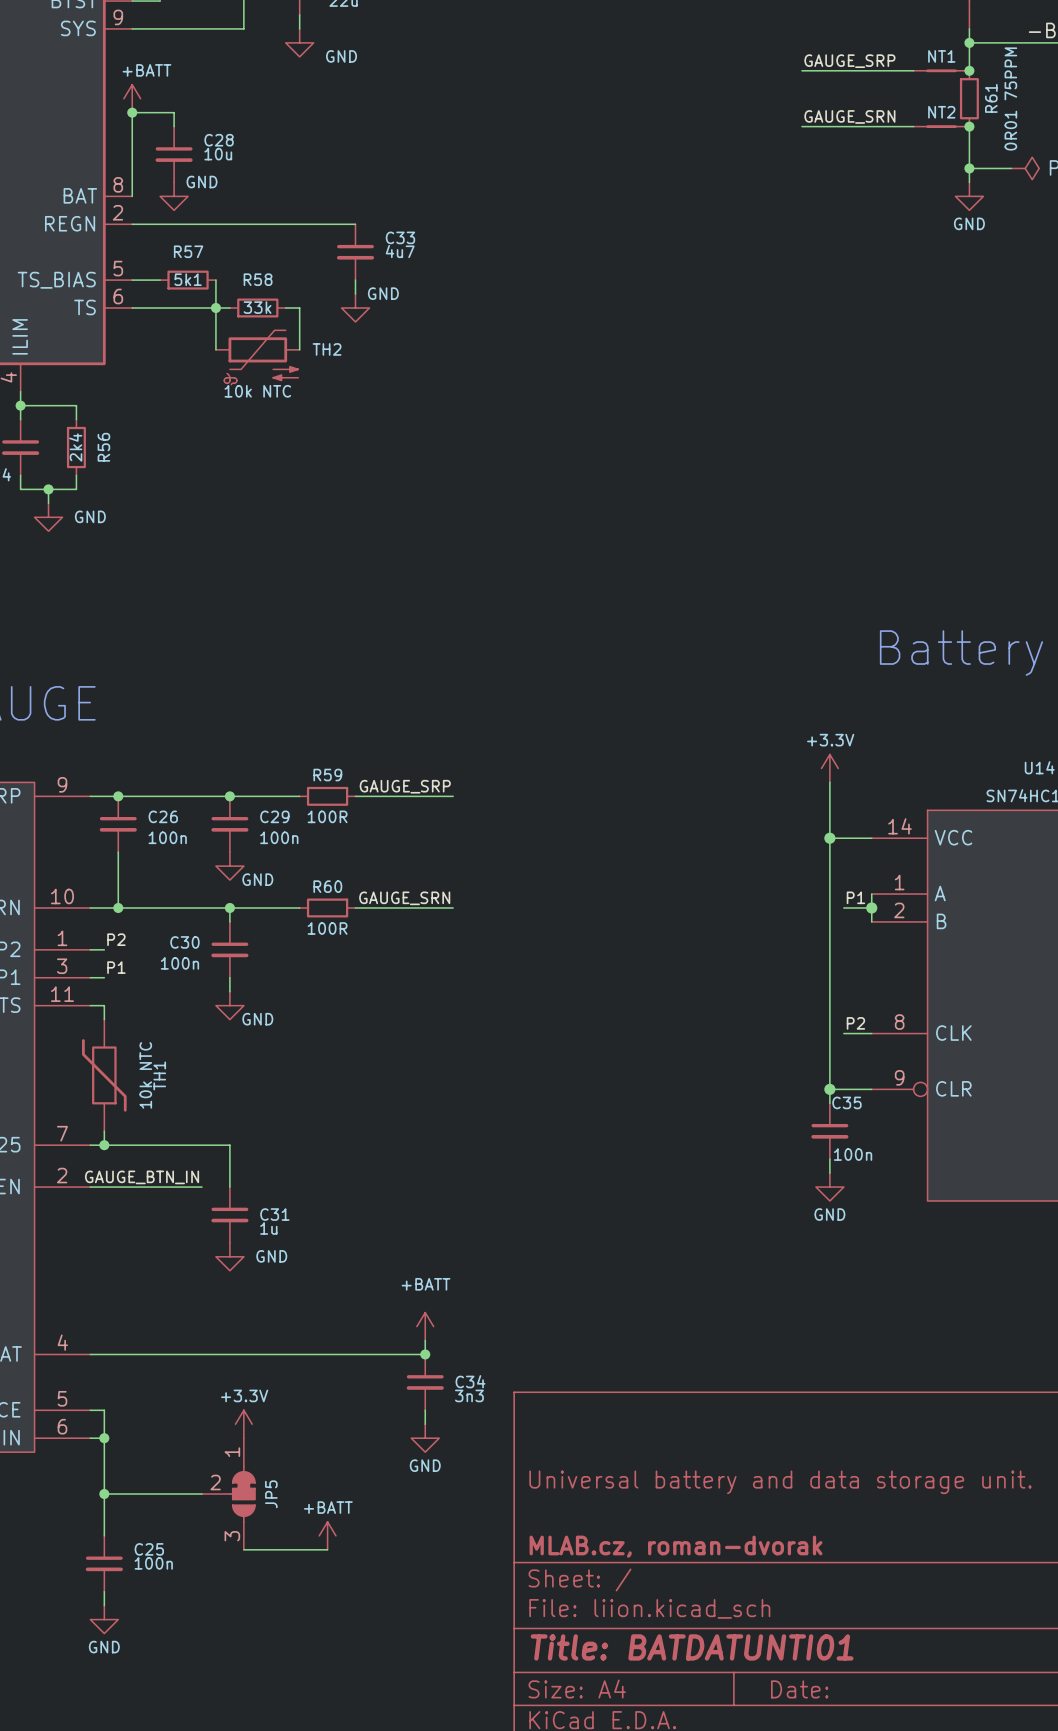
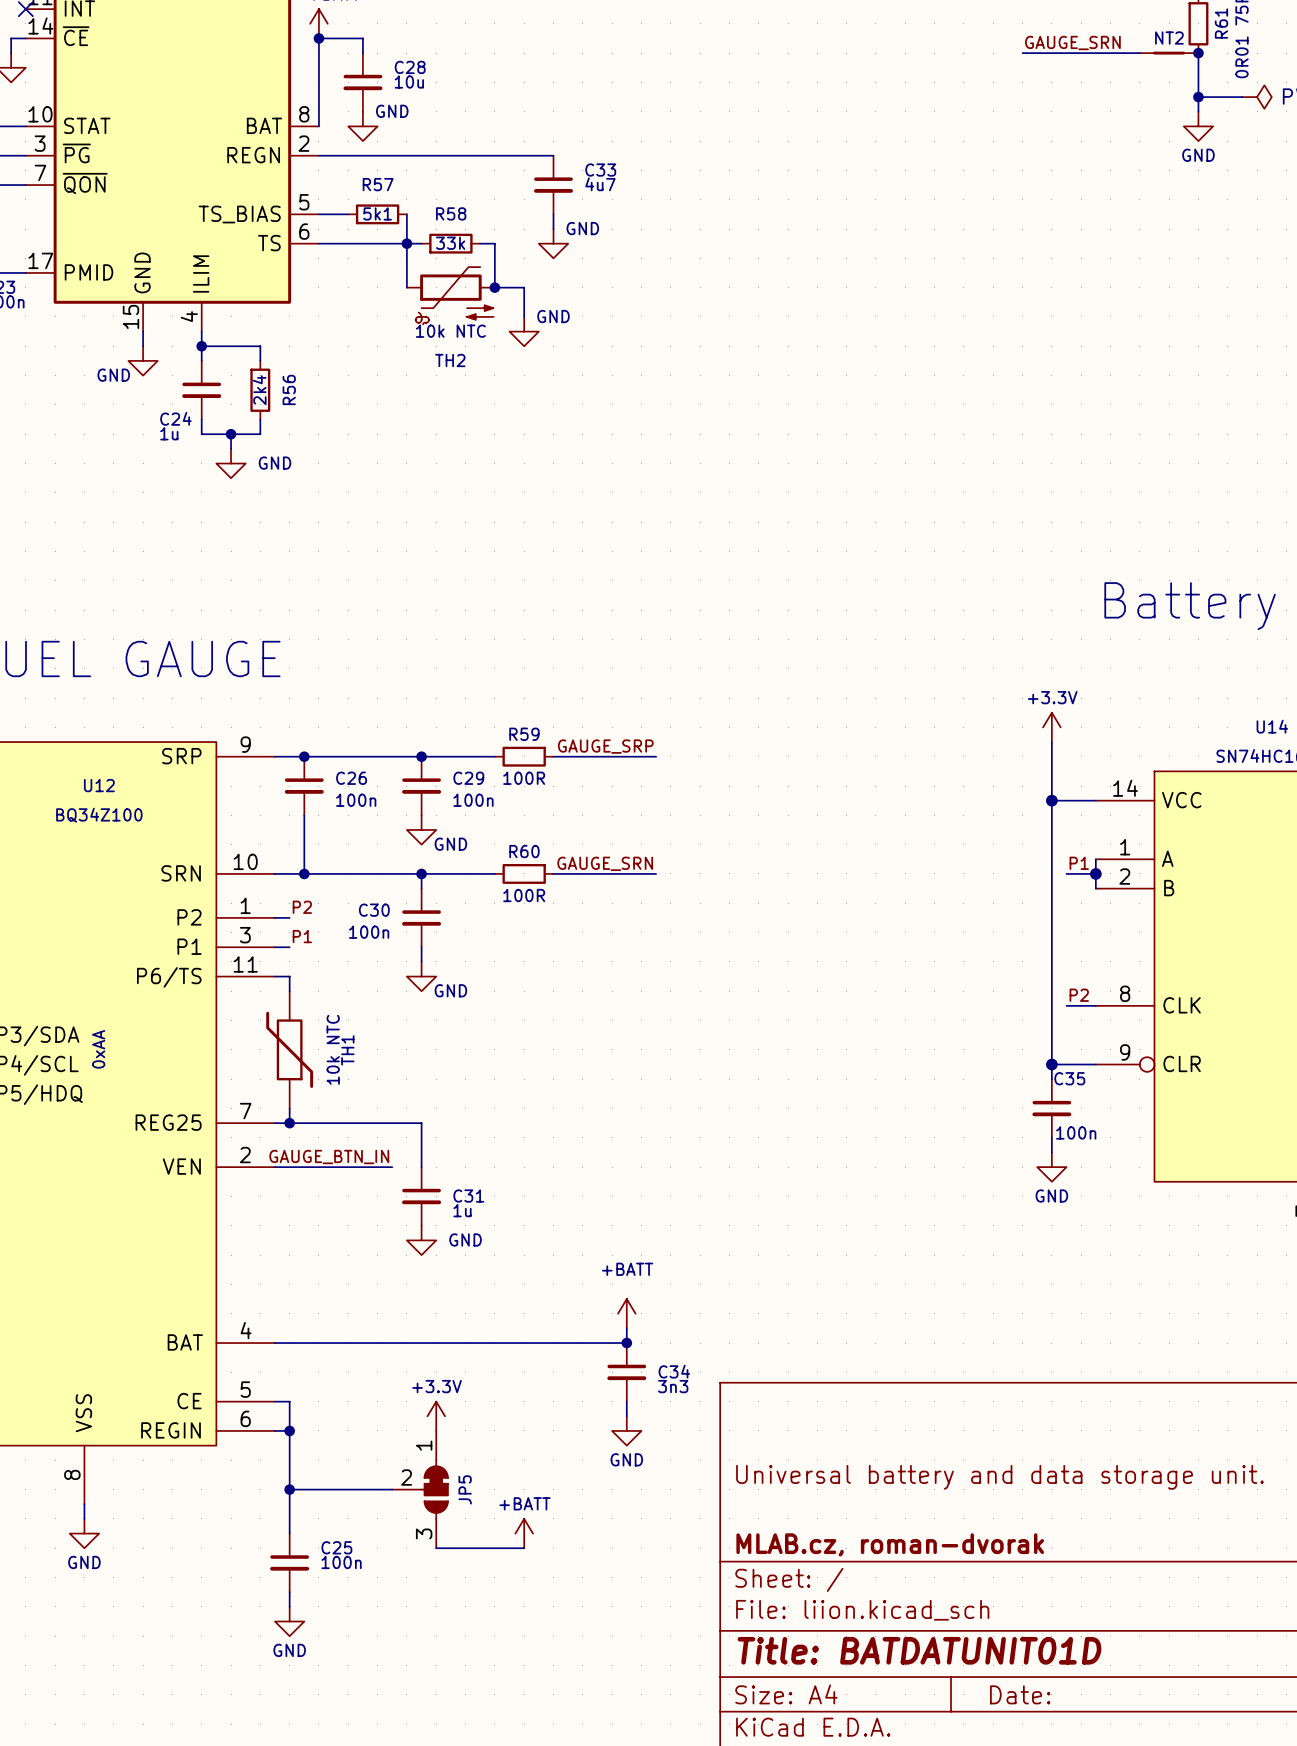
wire: none -> (494, 287) (524, 287) (524, 316)
junction: none -> (494, 287)
TH2 name position: TH2 (327, 349) -> TH2 (450, 360)
power symbol: none -> GND (524, 331)
title block: Title: BATDATUNTI01 (692, 1647) -> Title: BATDATUNIT01D (919, 1650)

